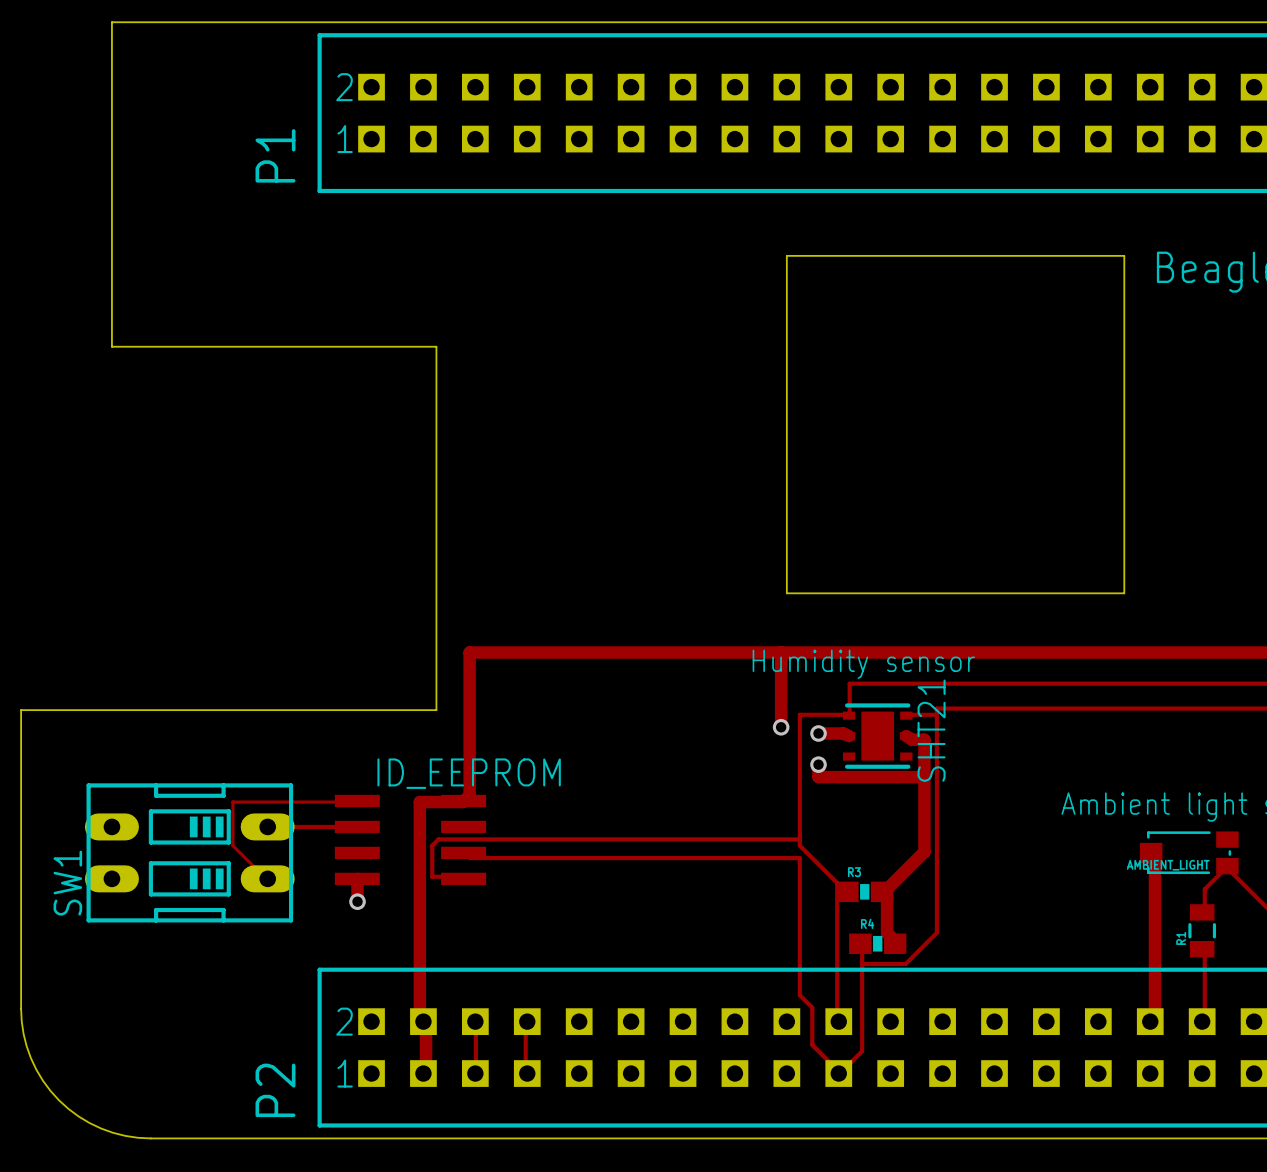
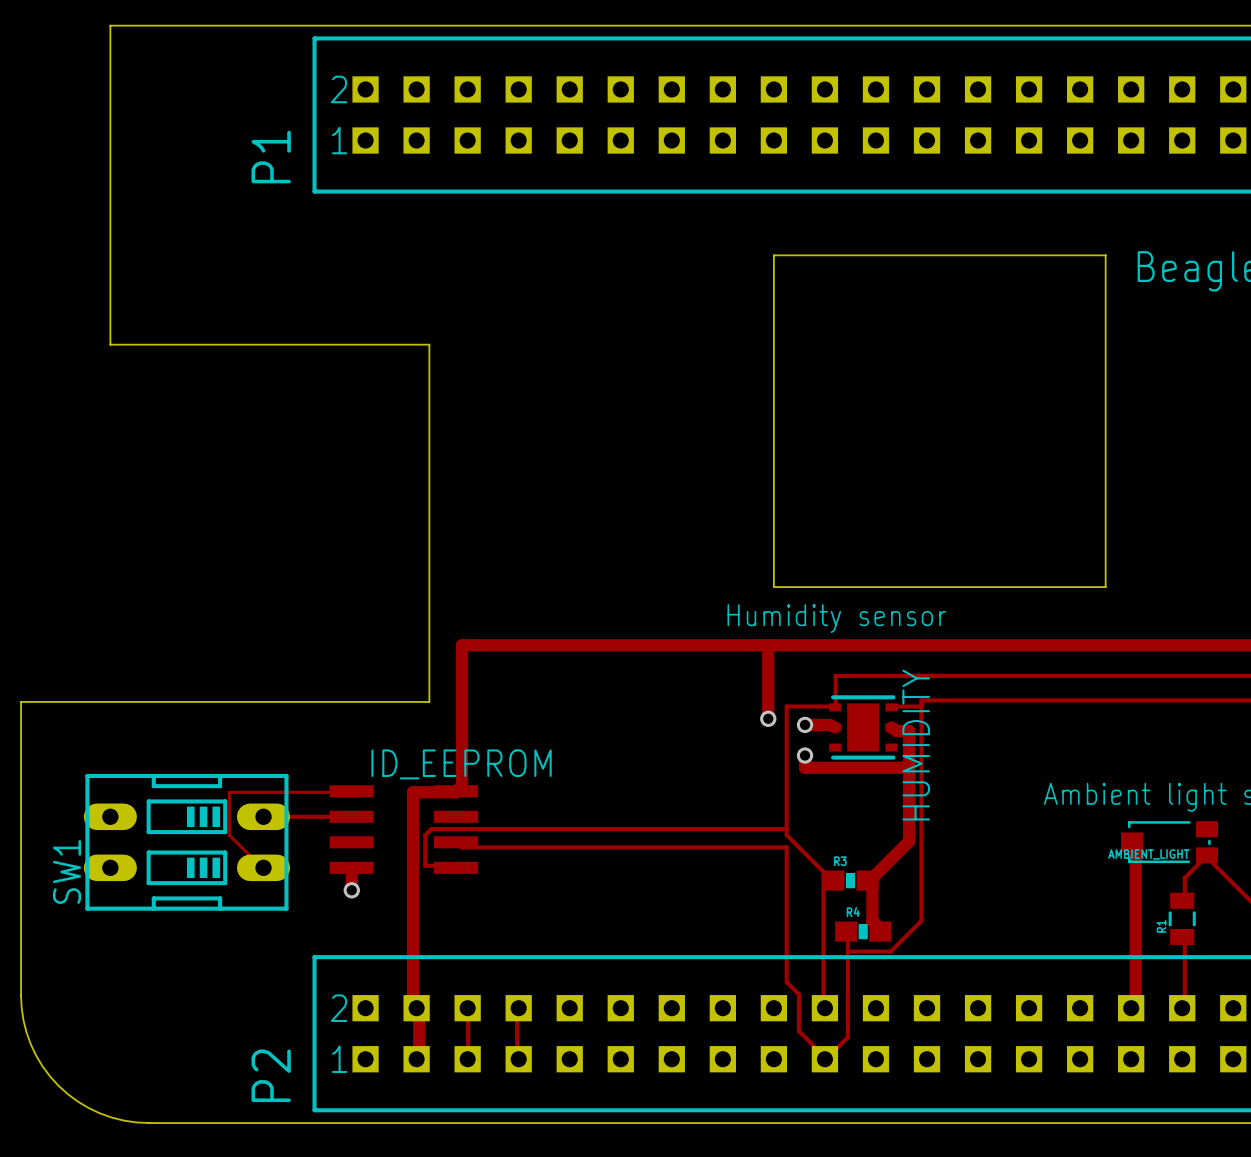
text position: Humidity sensor (863, 664) -> Humidity sensor (836, 618)
SHT21 name: SHT21 (931, 730) -> HUMIDITY (916, 745)

